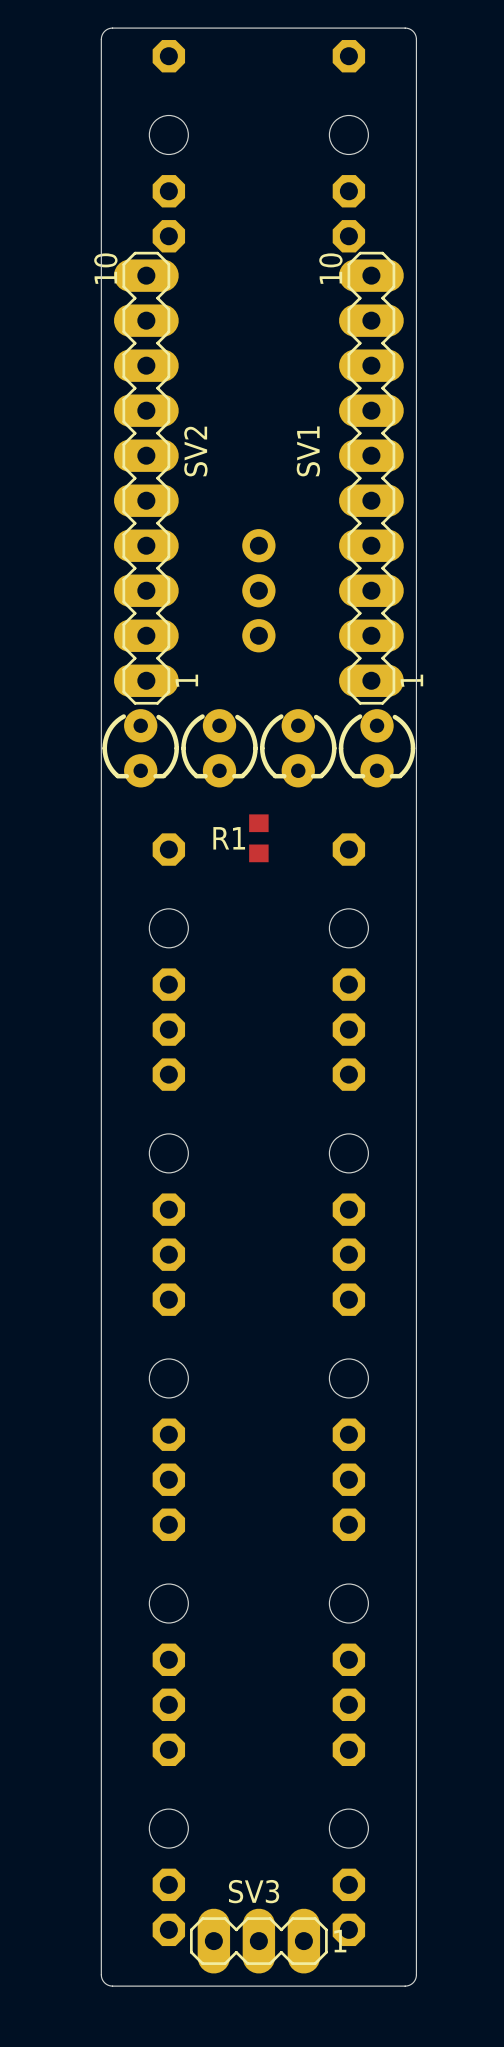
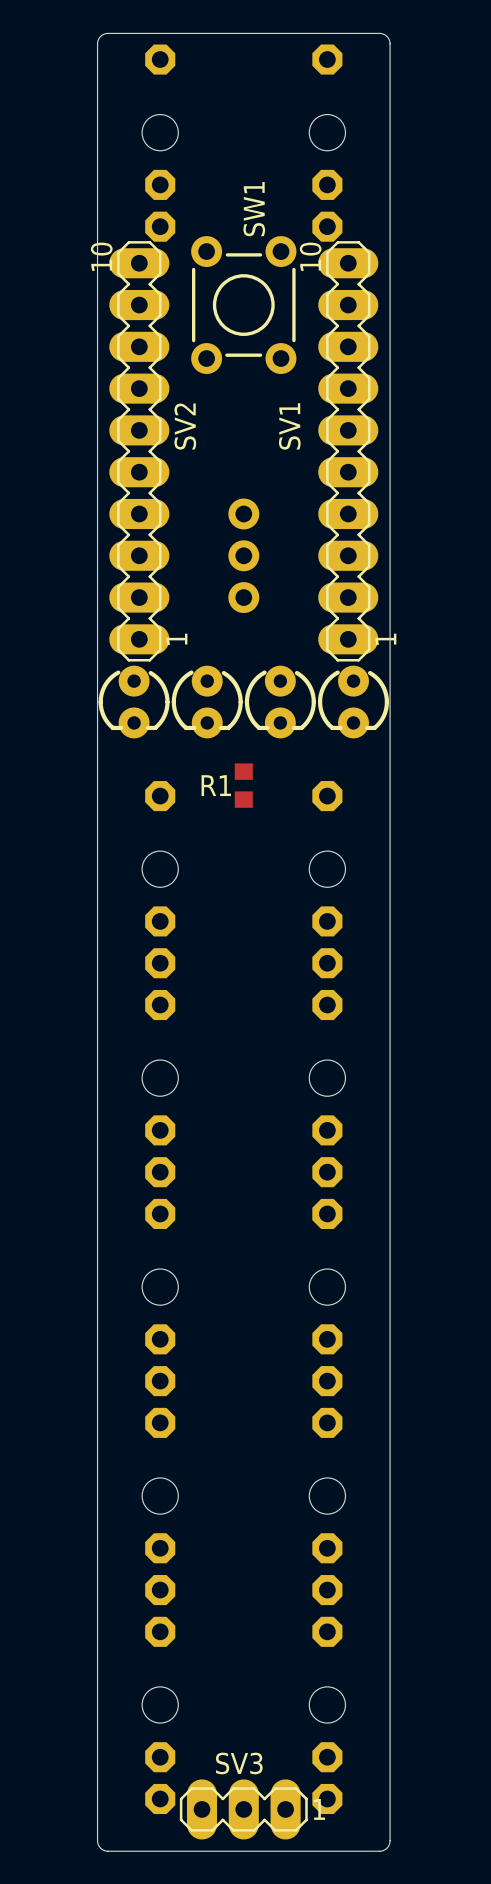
SW1: none -> (243, 305)

